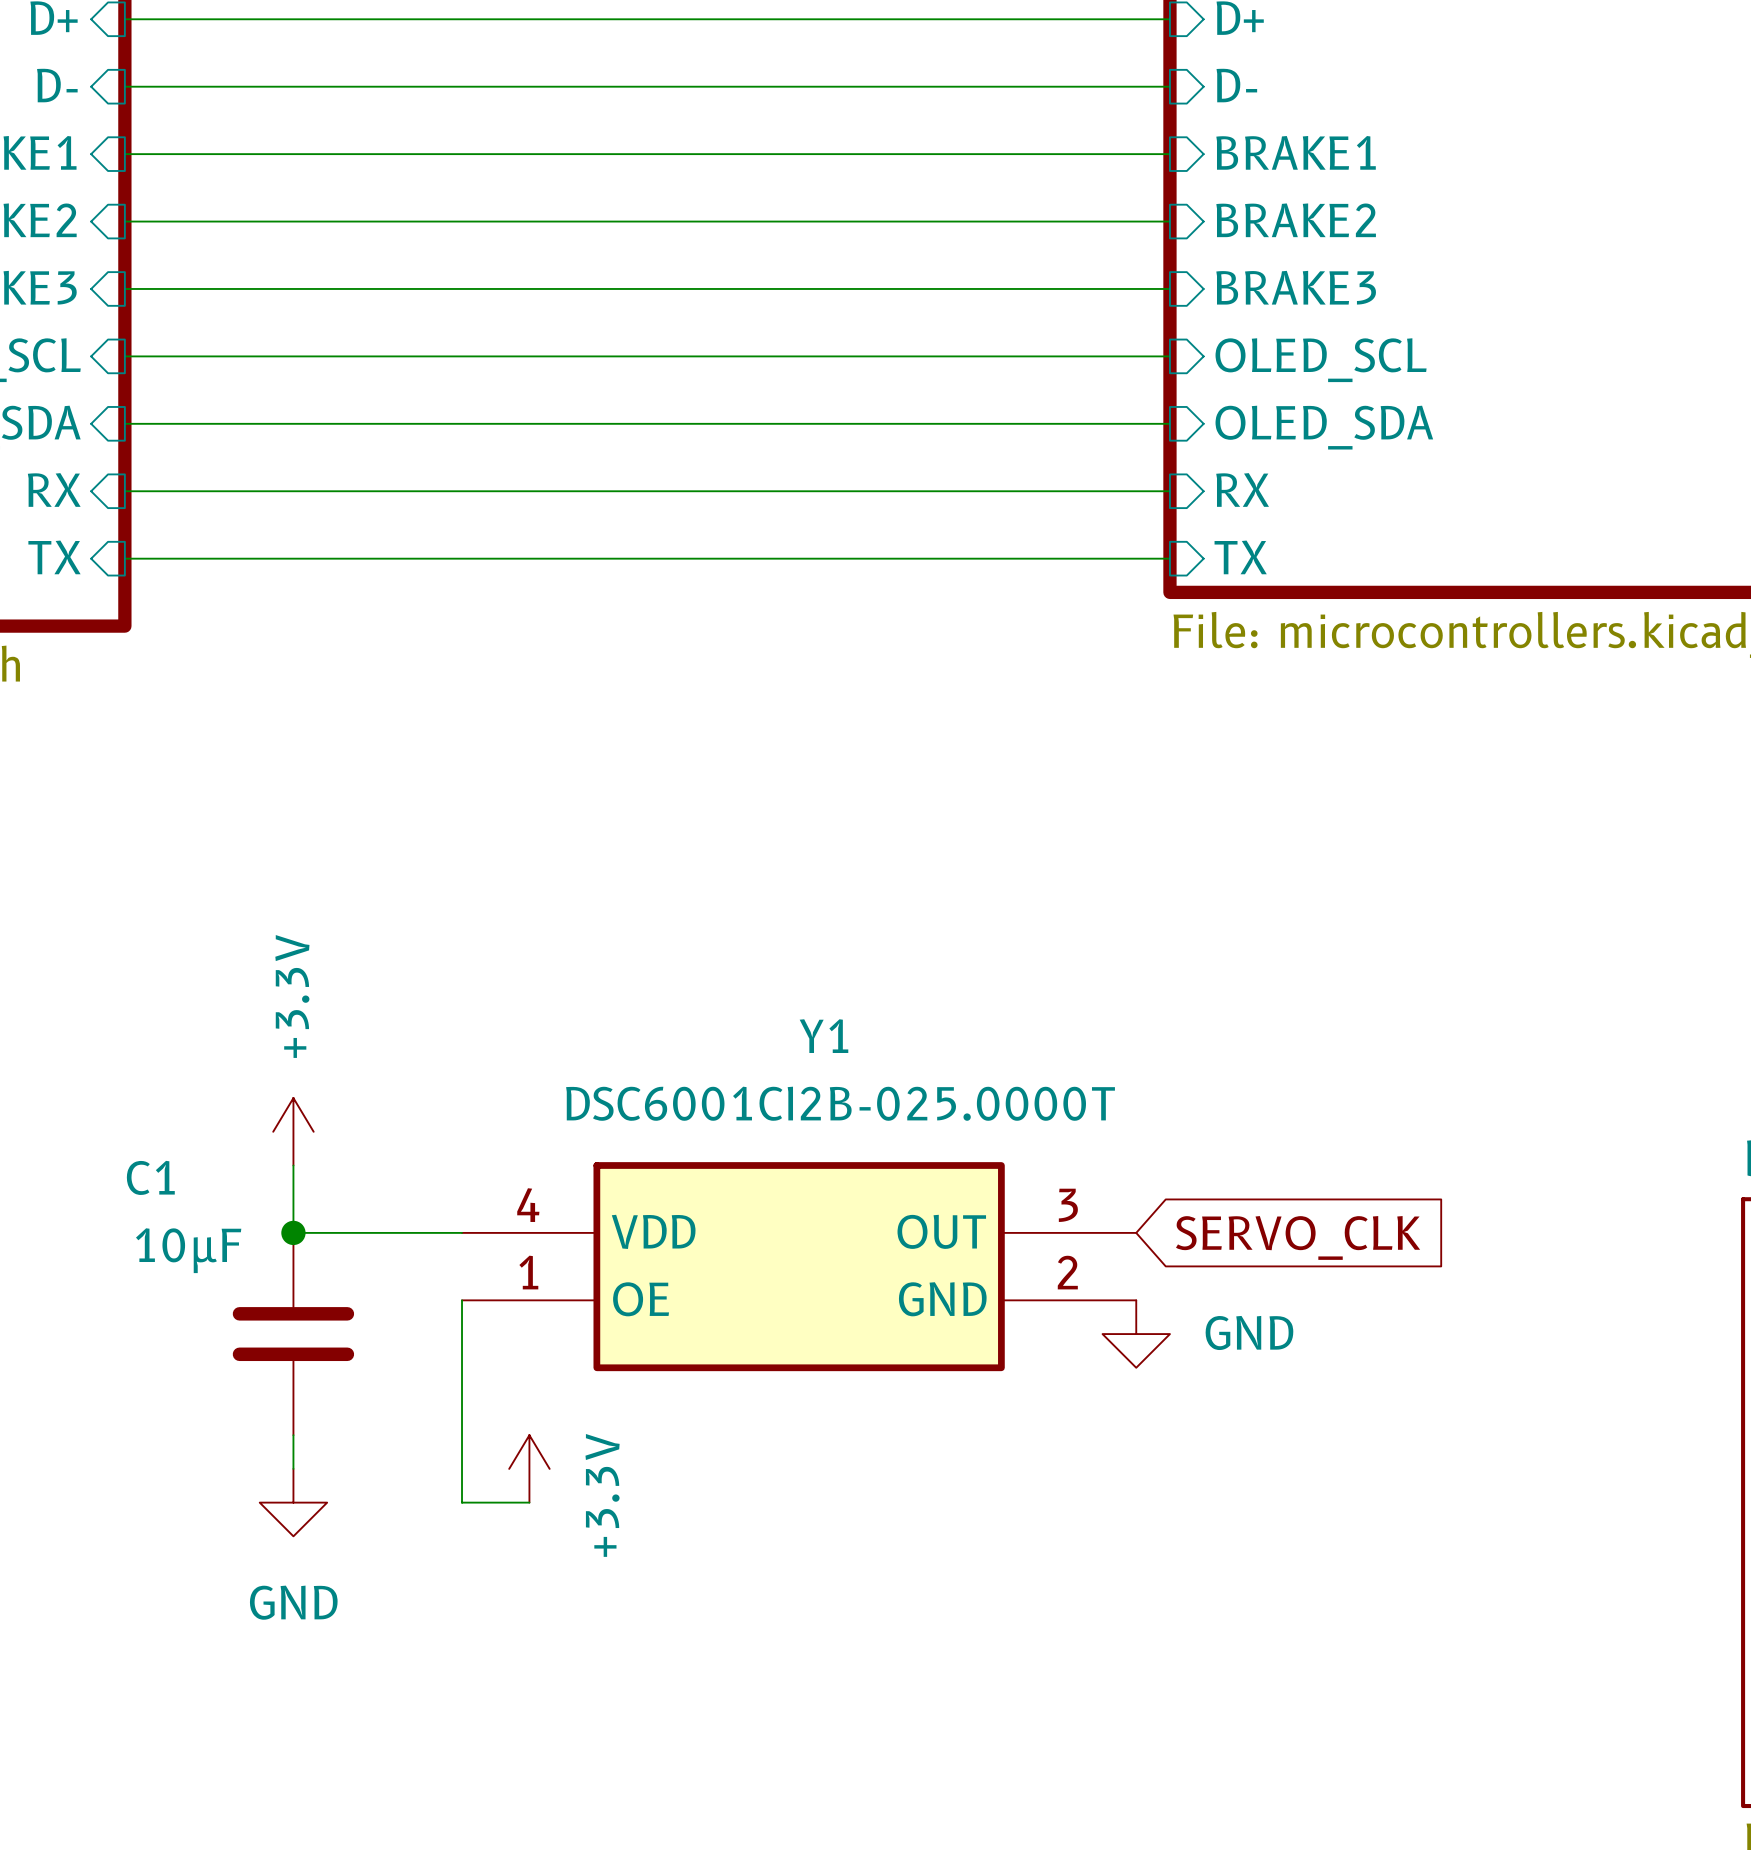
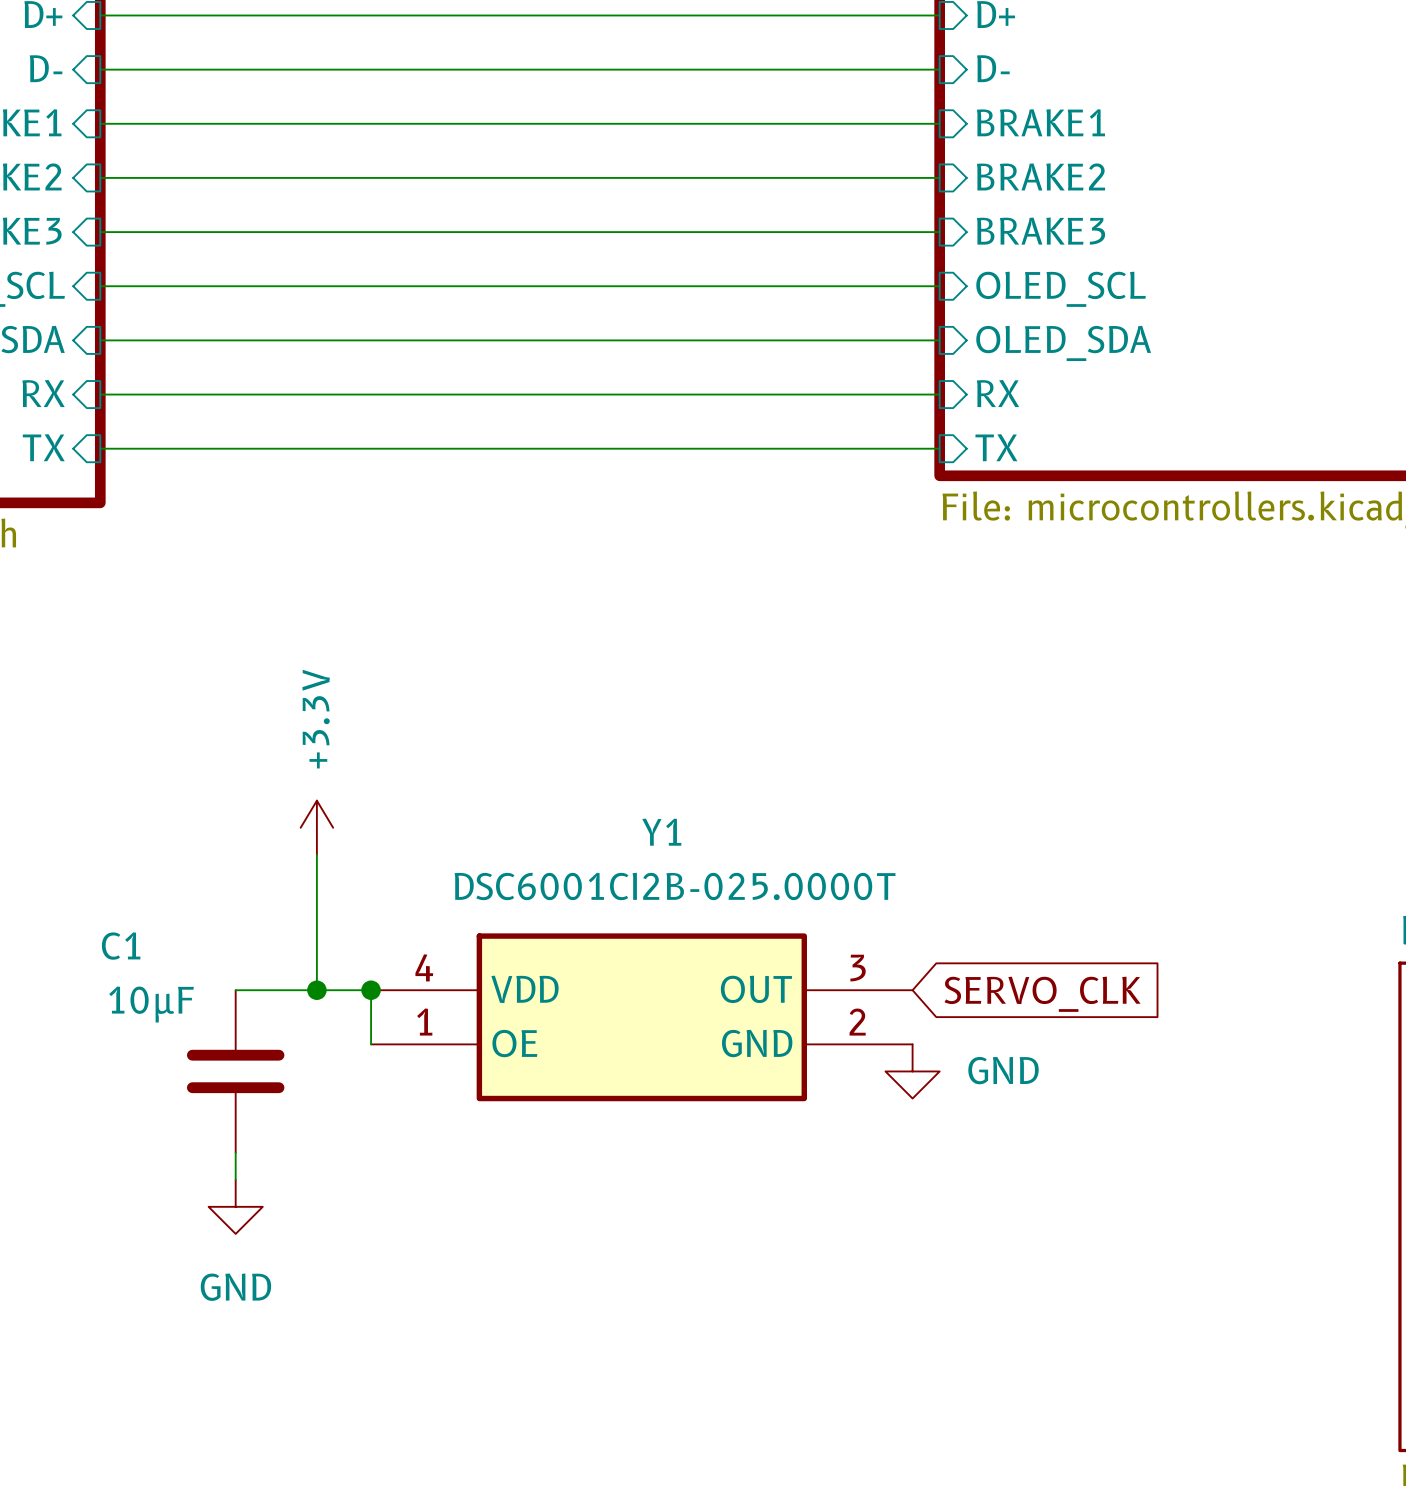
wire: none -> (316, 854) (316, 990)
power symbol position: +3.3V (293, 1131) -> +3.3V (316, 827)
wire: (293, 1165) (293, 1232) -> none
junction: (293, 1232) -> none
junction: none -> (316, 990)
junction: none -> (371, 990)
wire: (462, 1300) (462, 1502) (529, 1502) -> (371, 1044) (371, 990)
power symbol: +3.3V (529, 1468) -> none

